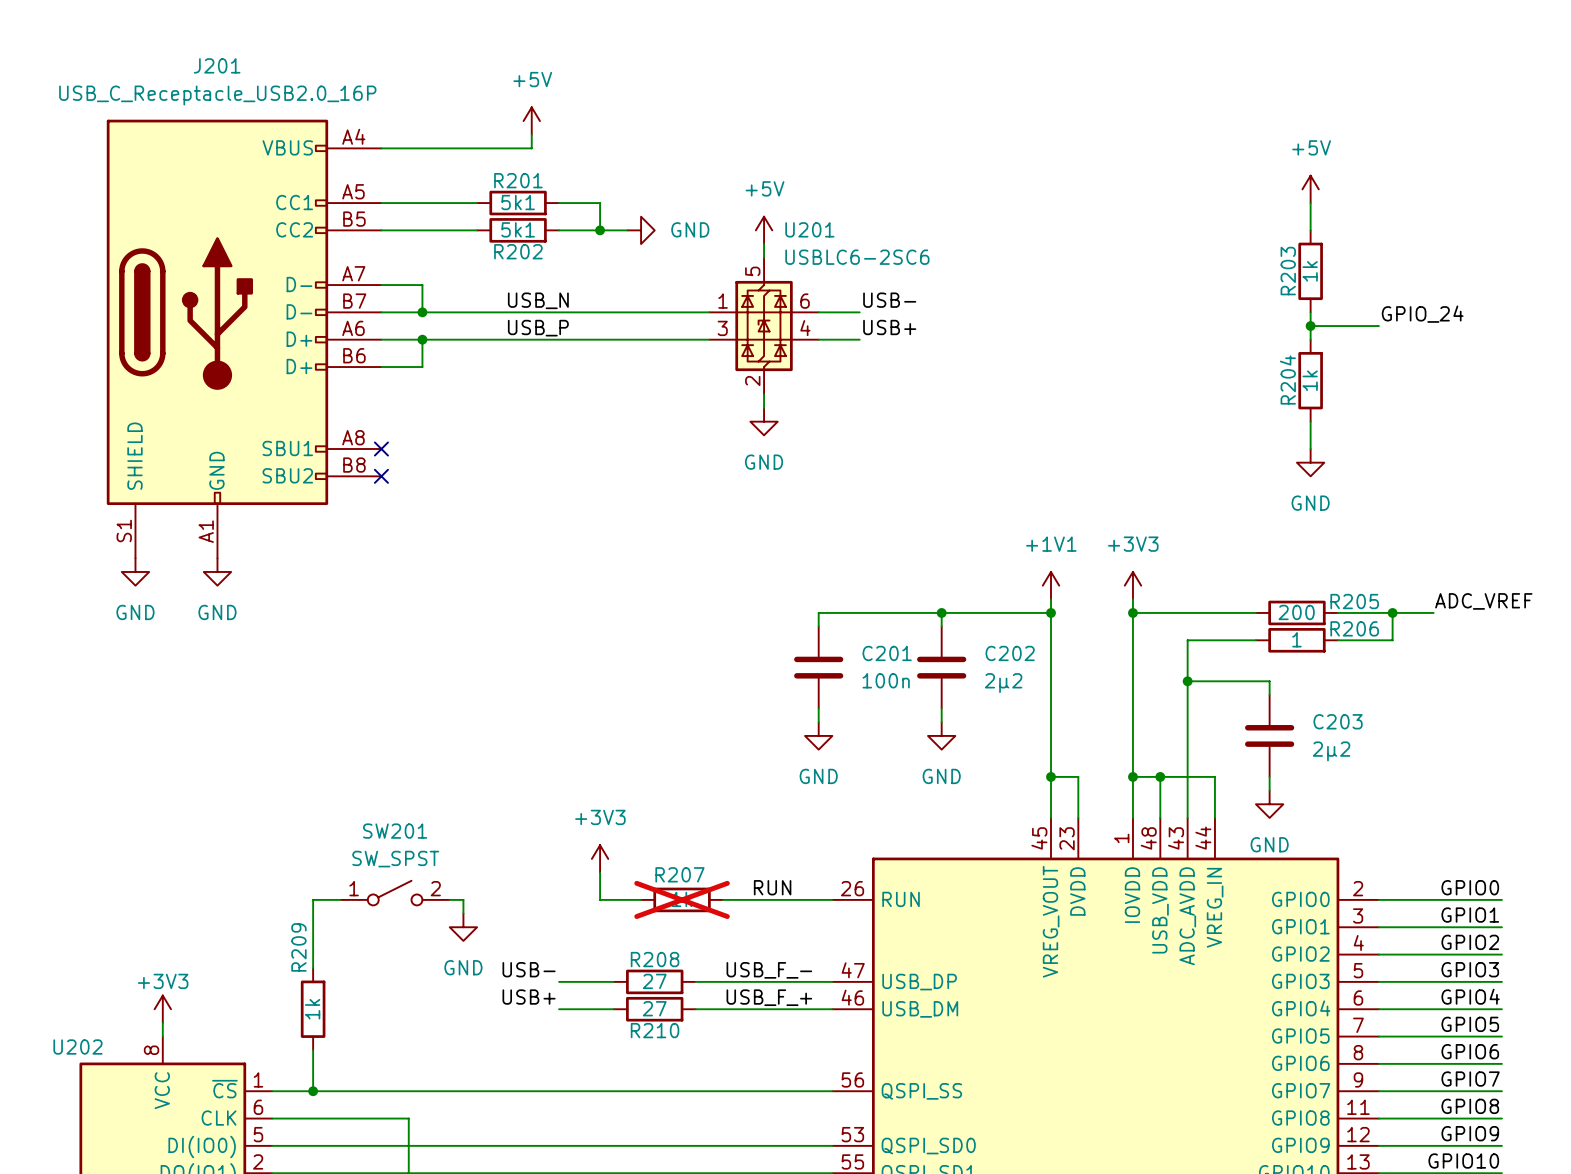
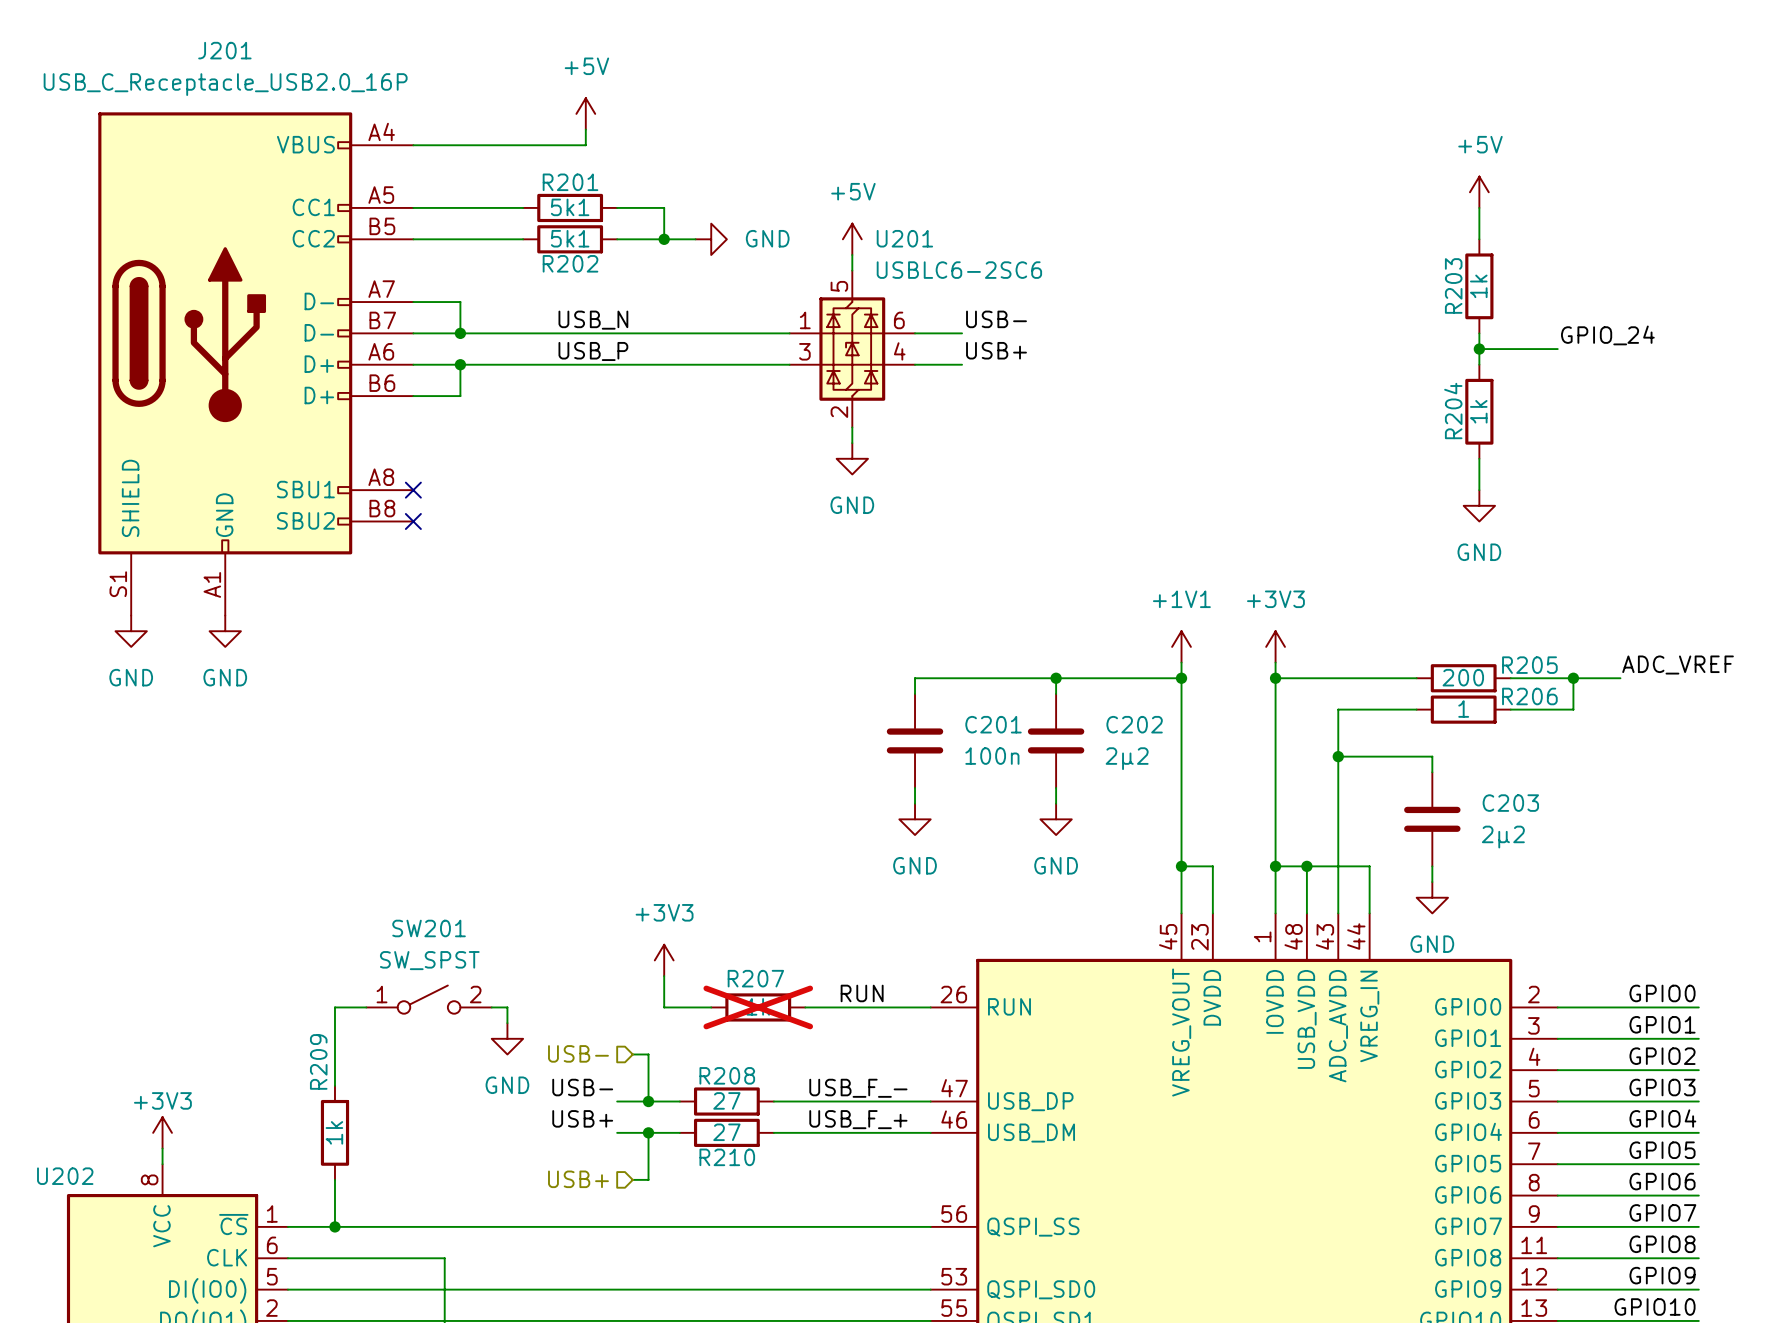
hierarchical label: none -> USB- (578, 1053)
wire: none -> (632, 1054) (648, 1054) (648, 1101)
junction: none -> (648, 1101)
wire: none -> (648, 1132) (648, 1179) (632, 1179)
junction: none -> (648, 1132)
hierarchical label: none -> USB+ (578, 1179)

